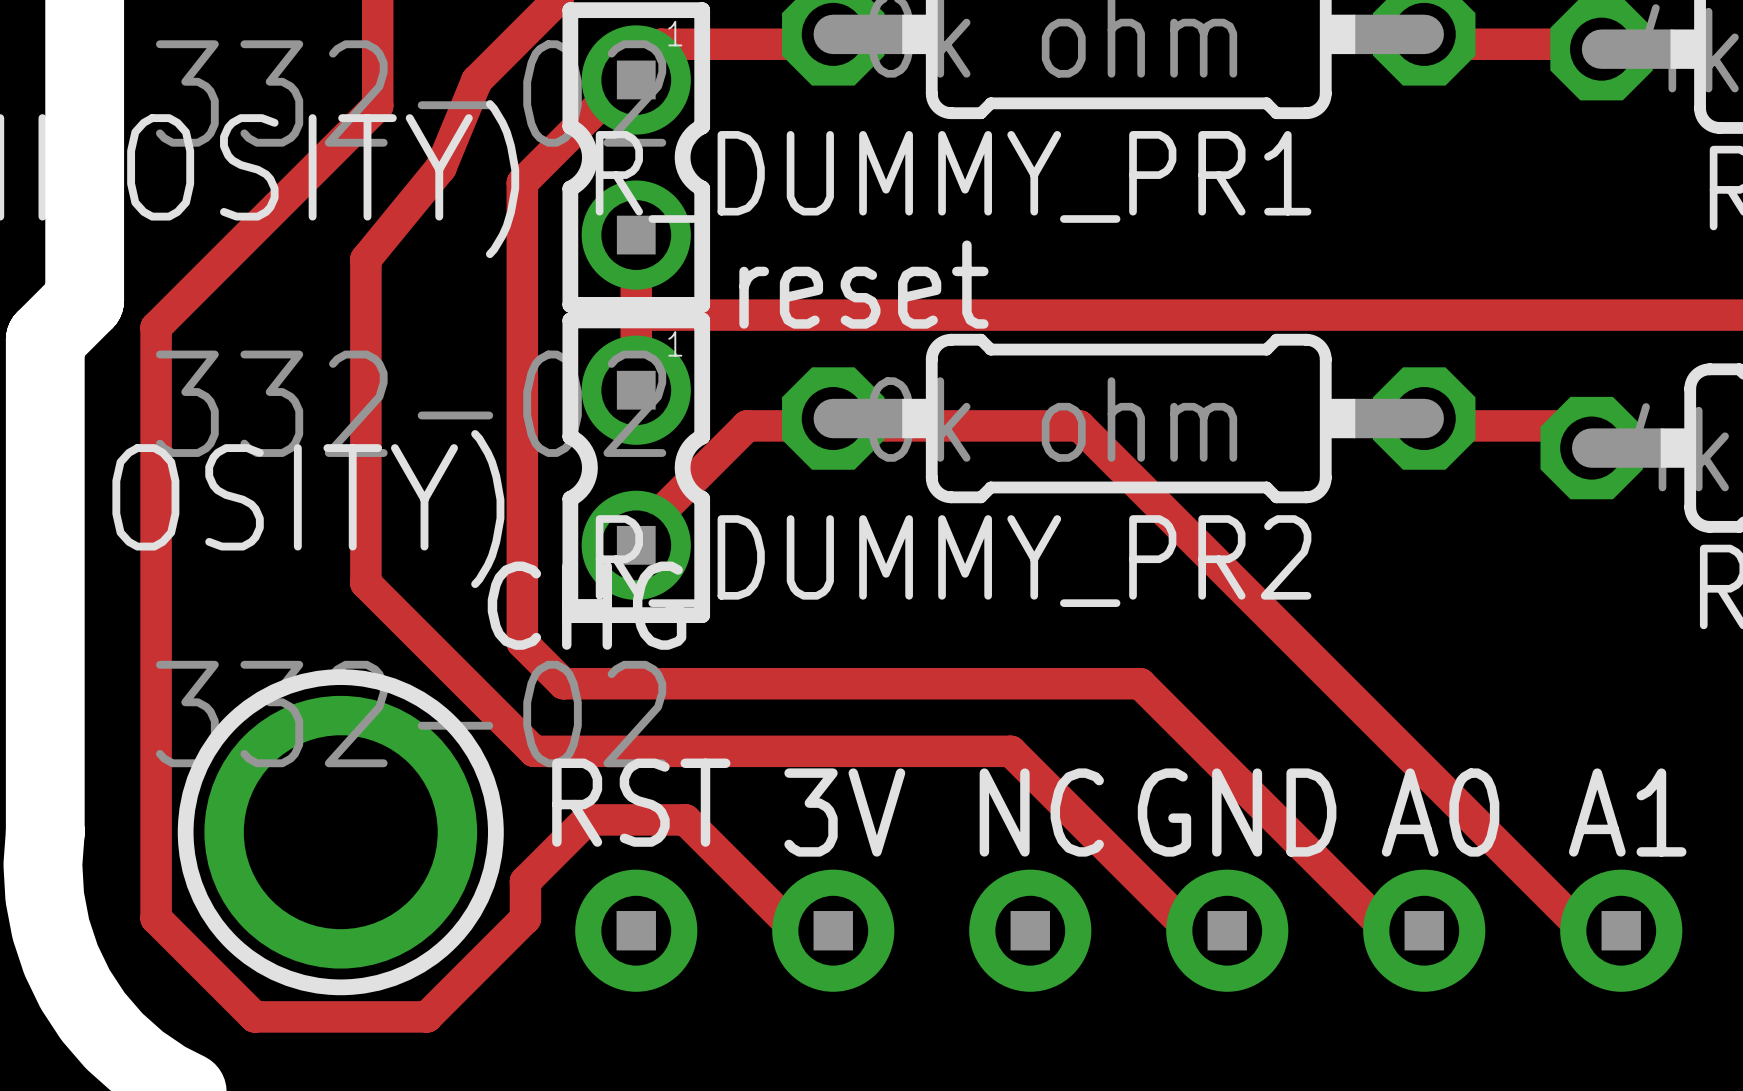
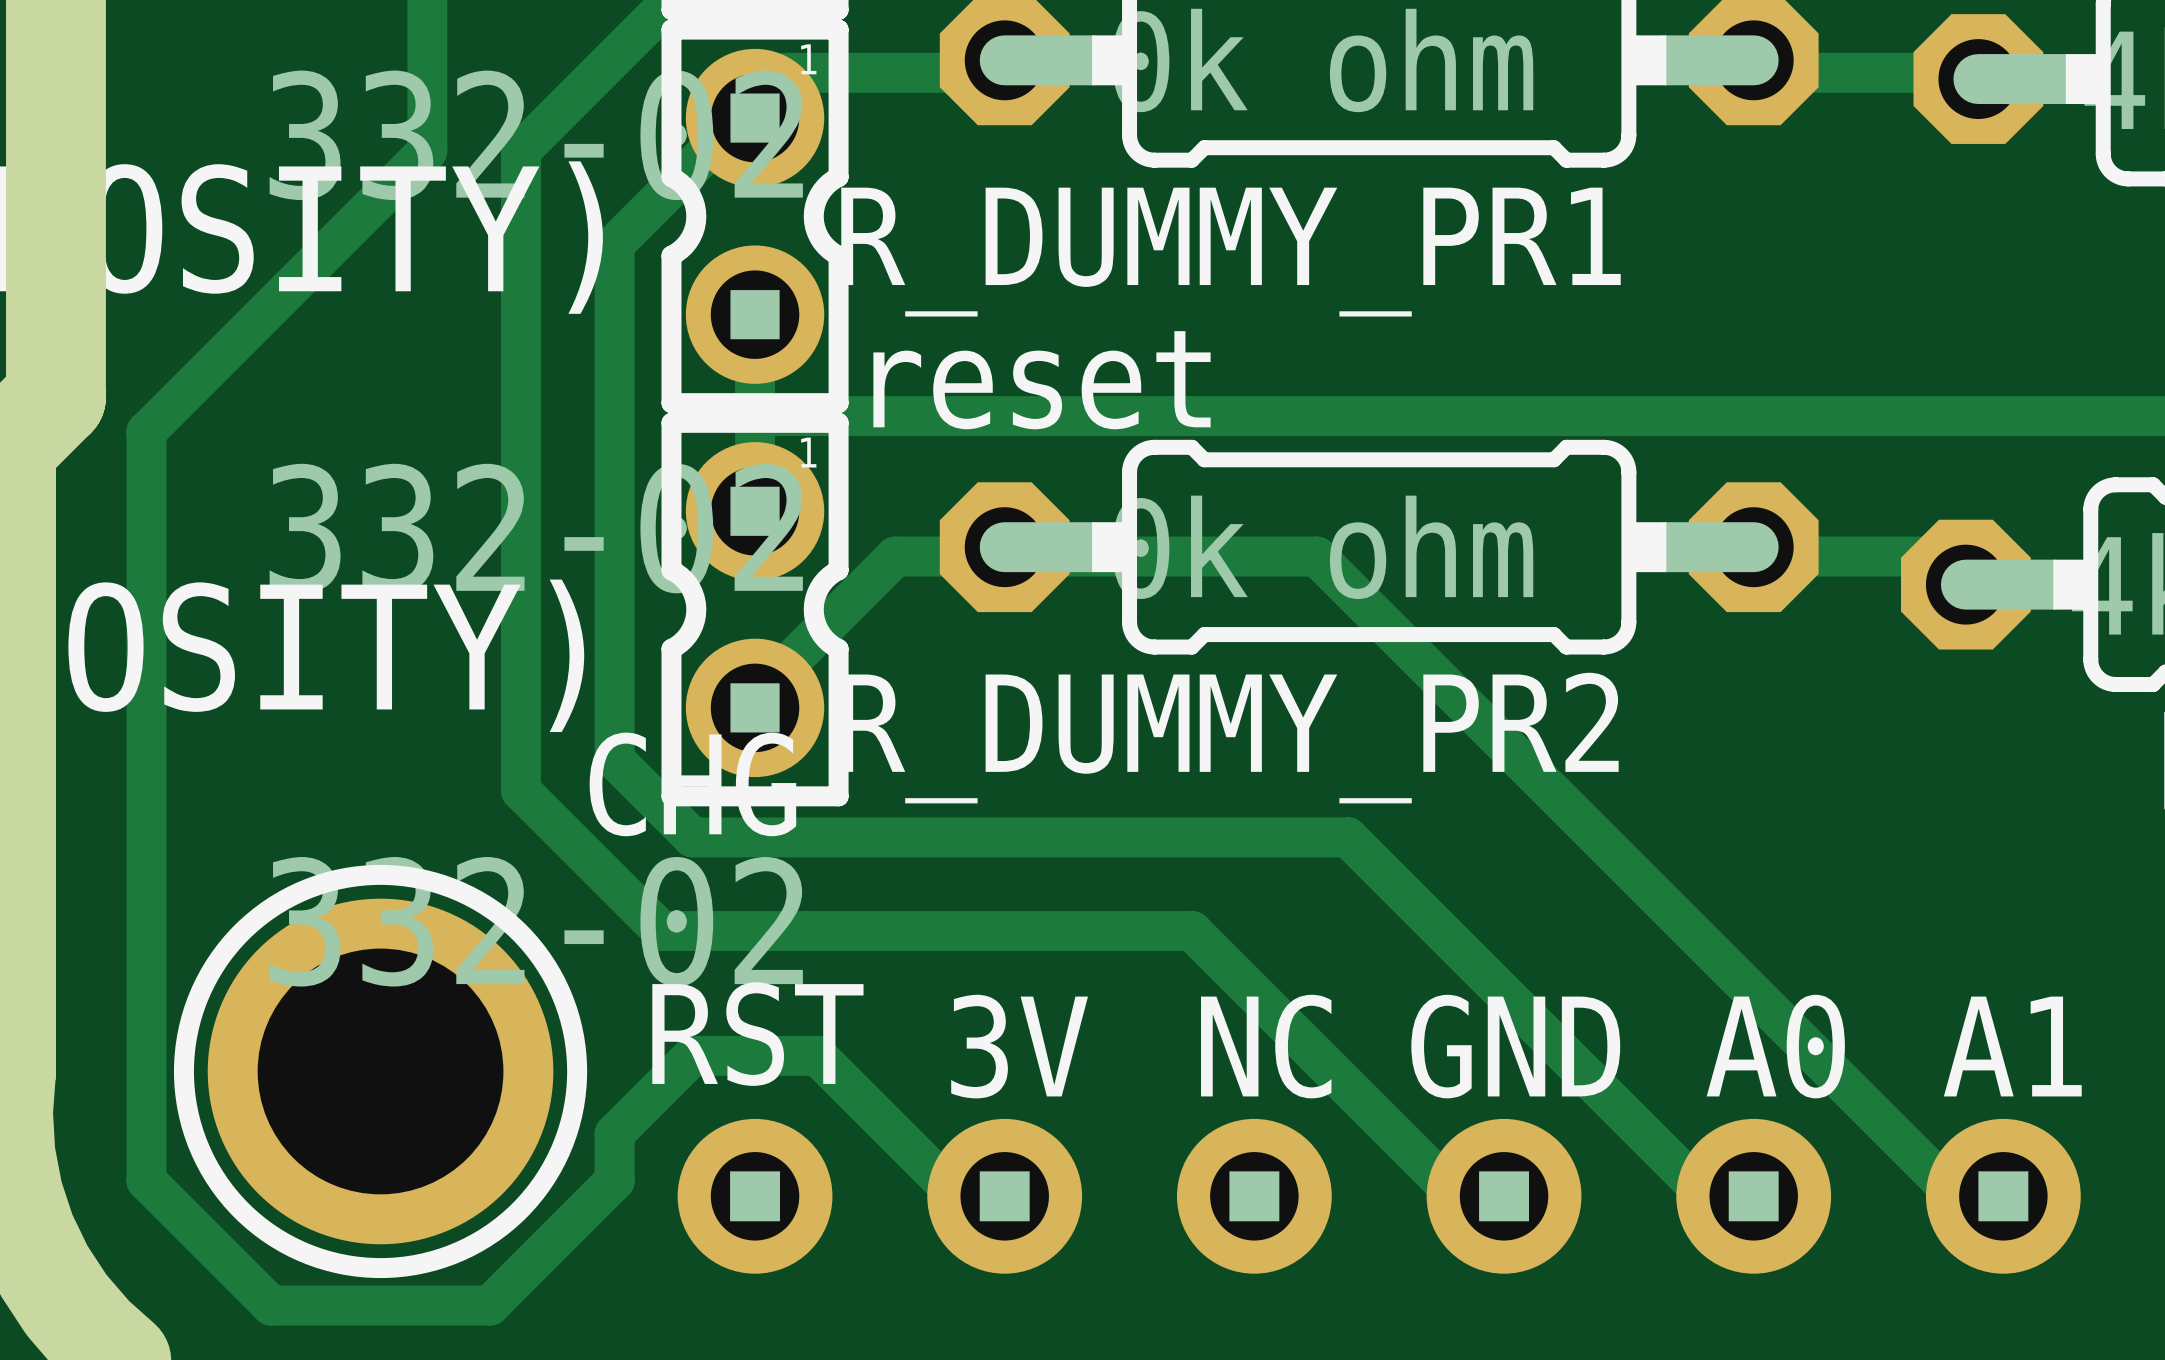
track: (476, 80) (440, 167) (365, 259) (365, 583) (534, 751) (1010, 751) -> (553, 118) (520, 150) (520, 790) (661, 931) (1191, 931) (1229, 968)
track: (525, 179) (522, 182) (522, 642) (563, 683) (1140, 683) -> (614, 244) (614, 759) (692, 837) (1347, 837) (1393, 883)

